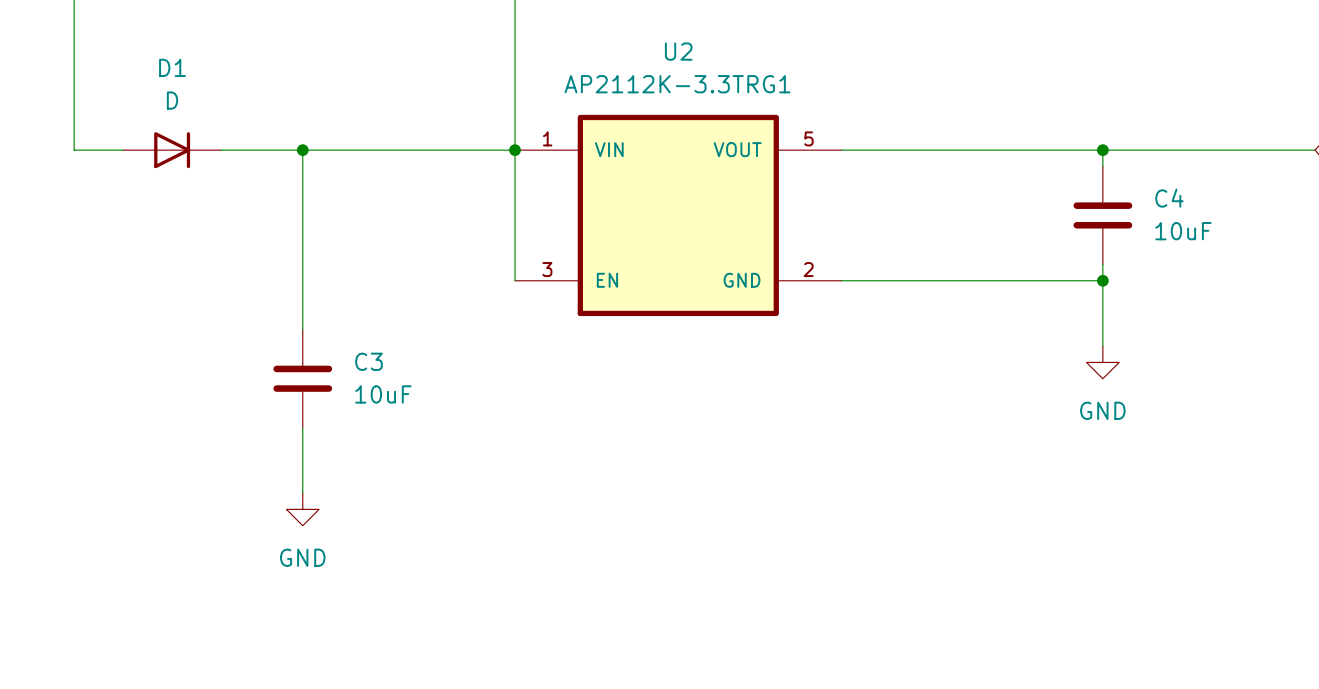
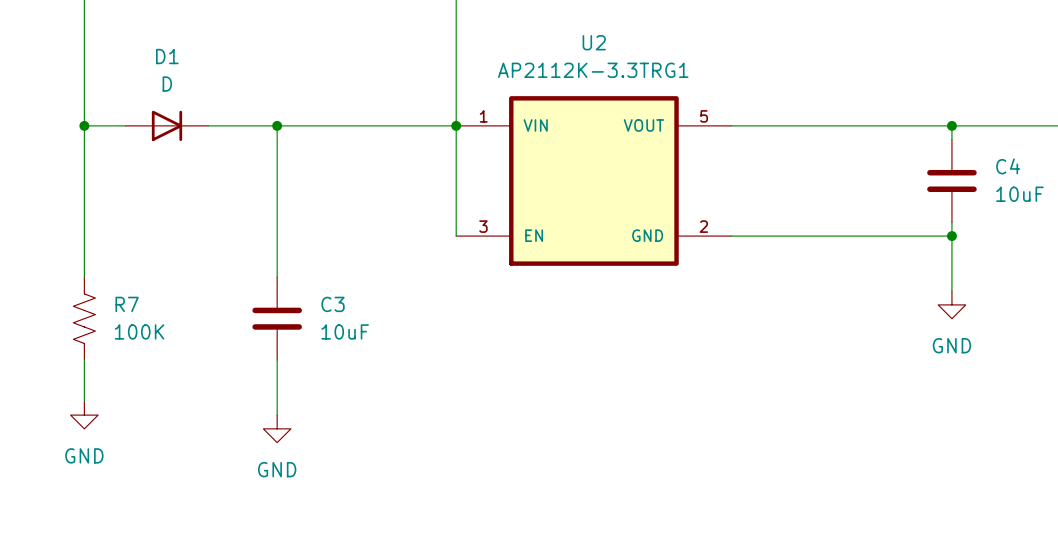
wire: none -> (84, 125) (84, 277)
junction: none -> (84, 125)
R7: none -> 100K (84, 318)
wire: none -> (84, 360) (84, 401)
power symbol: none -> GND (84, 415)

